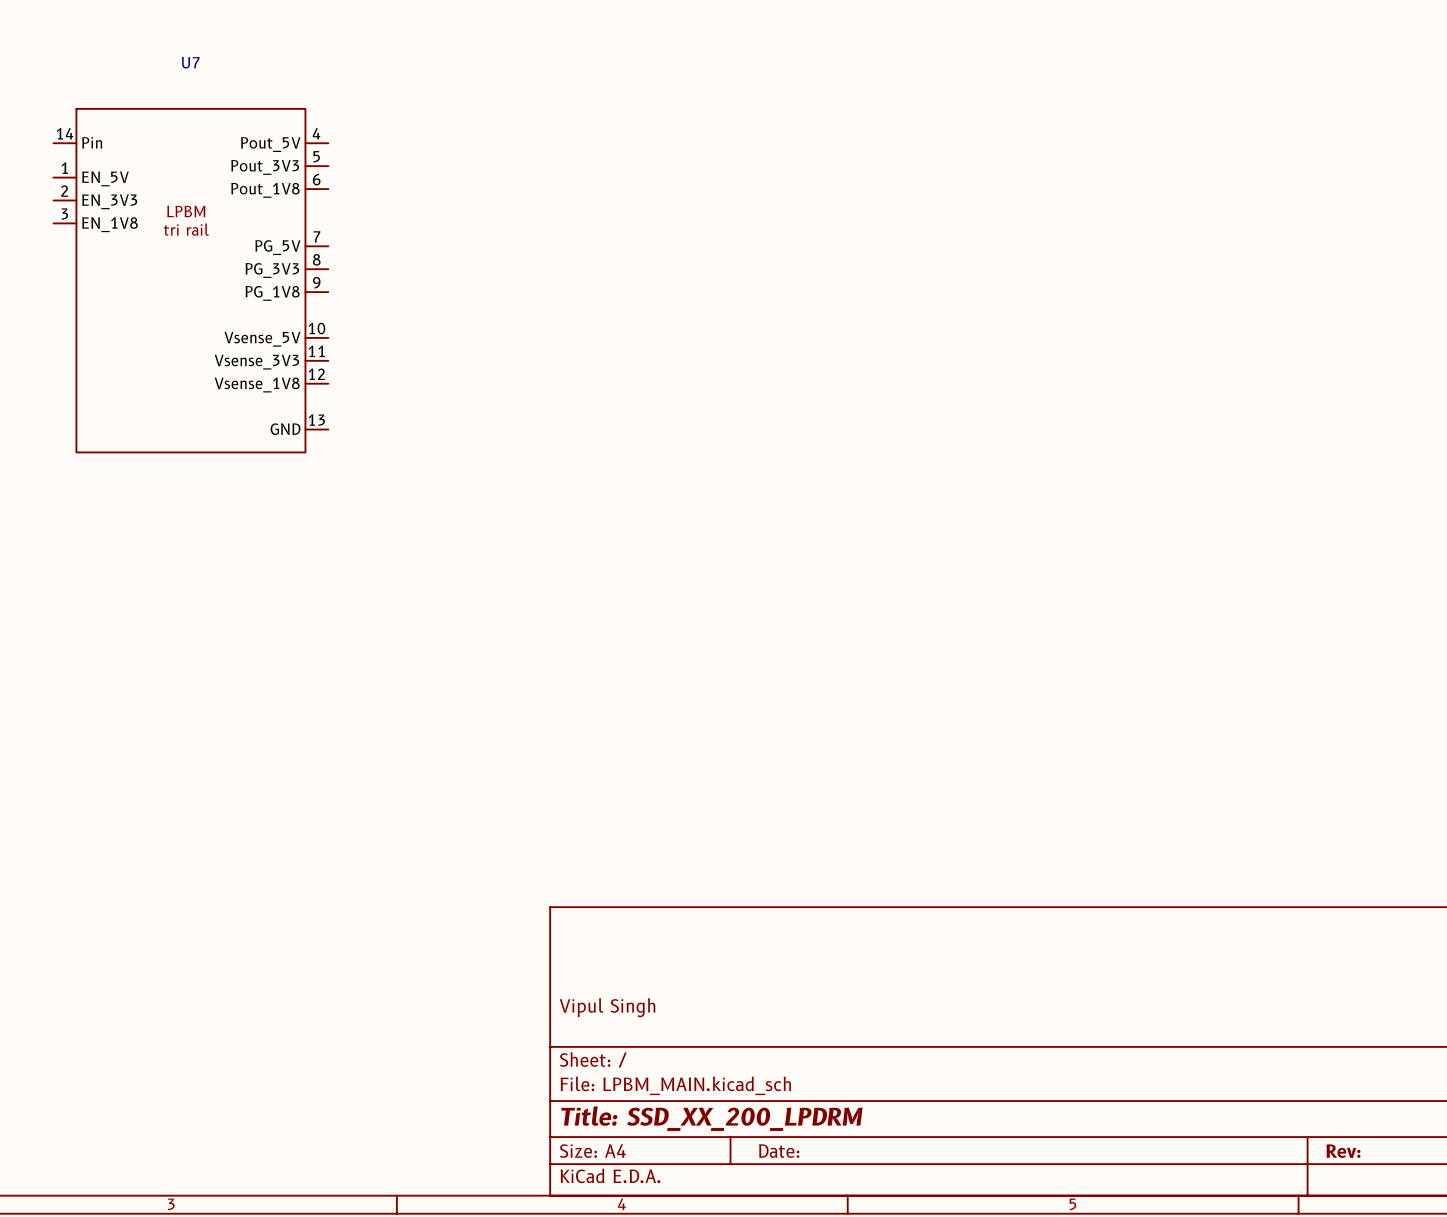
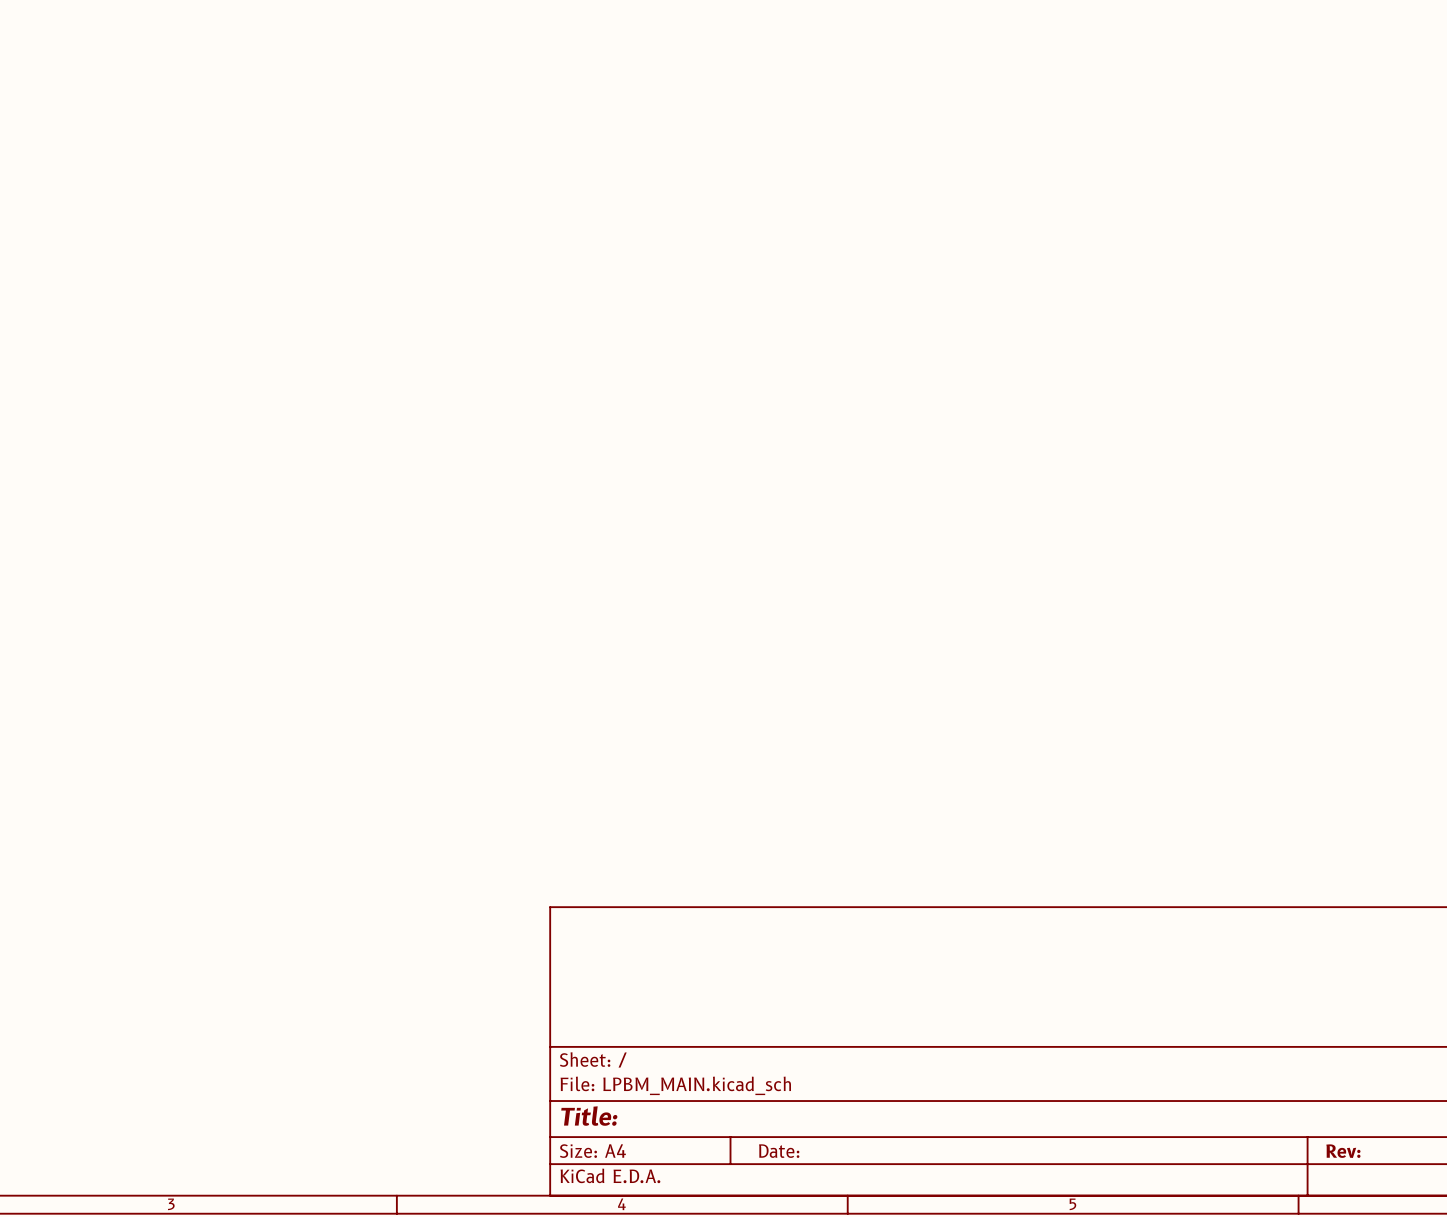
U7: (190, 280) -> none
title block: Vipul Singh (607, 1007) -> none
title block: Title: SSD_XX_200_LPDRM (711, 1118) -> Title: (589, 1116)

